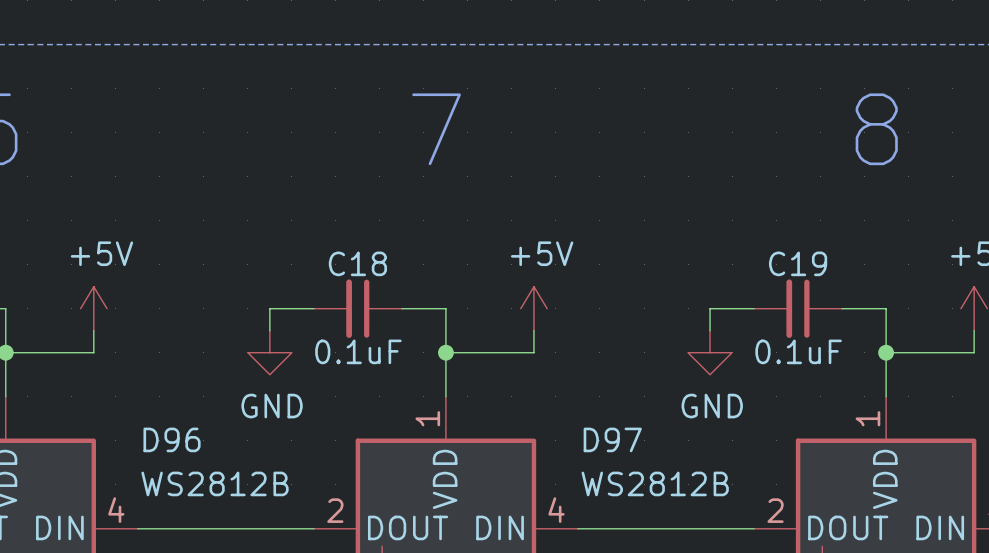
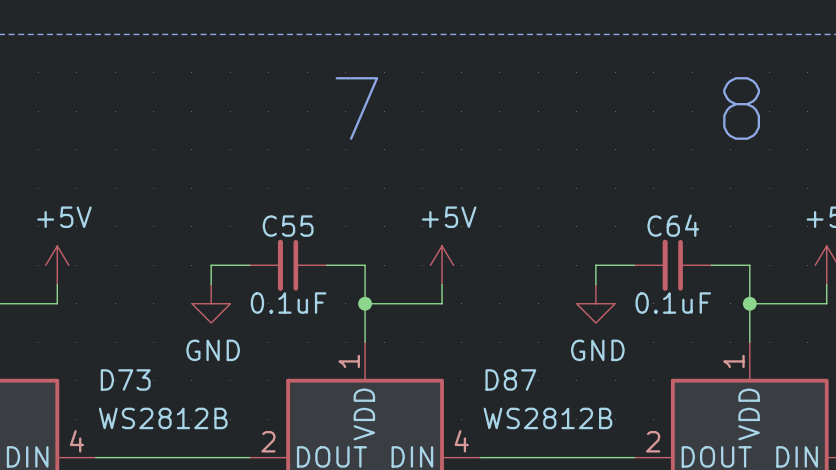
C18 name: C18 (357, 263) -> C55 (288, 226)
C19 name: C19 (798, 263) -> C64 (673, 225)
D96 name: D96 (172, 439) -> D73 (125, 379)
D97 name: D97 (612, 439) -> D87 (510, 379)

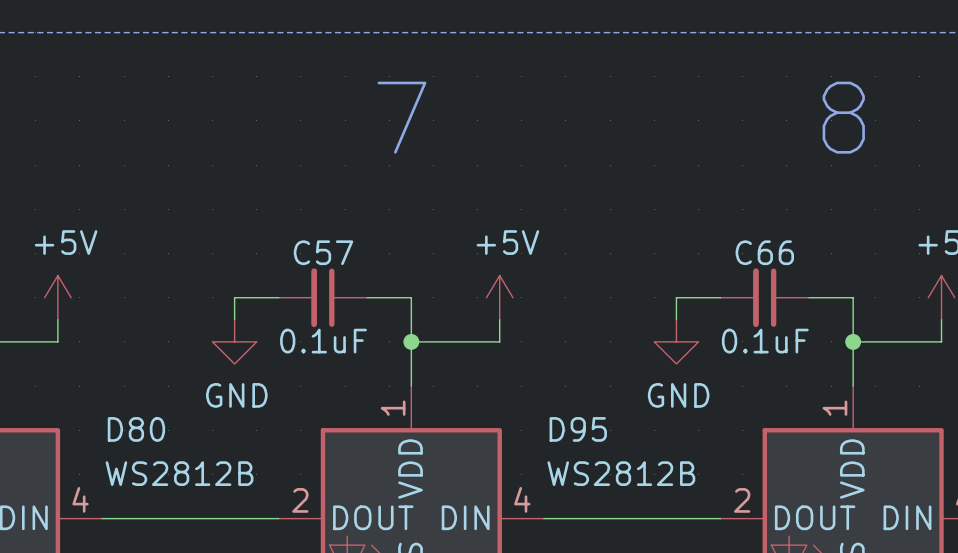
C64 name: C64 (673, 225) -> C66 (764, 252)
C55 name: C55 (288, 226) -> C57 (323, 252)
D73 name: D73 (125, 379) -> D80 (136, 429)
D87 name: D87 (510, 379) -> D95 (578, 429)

